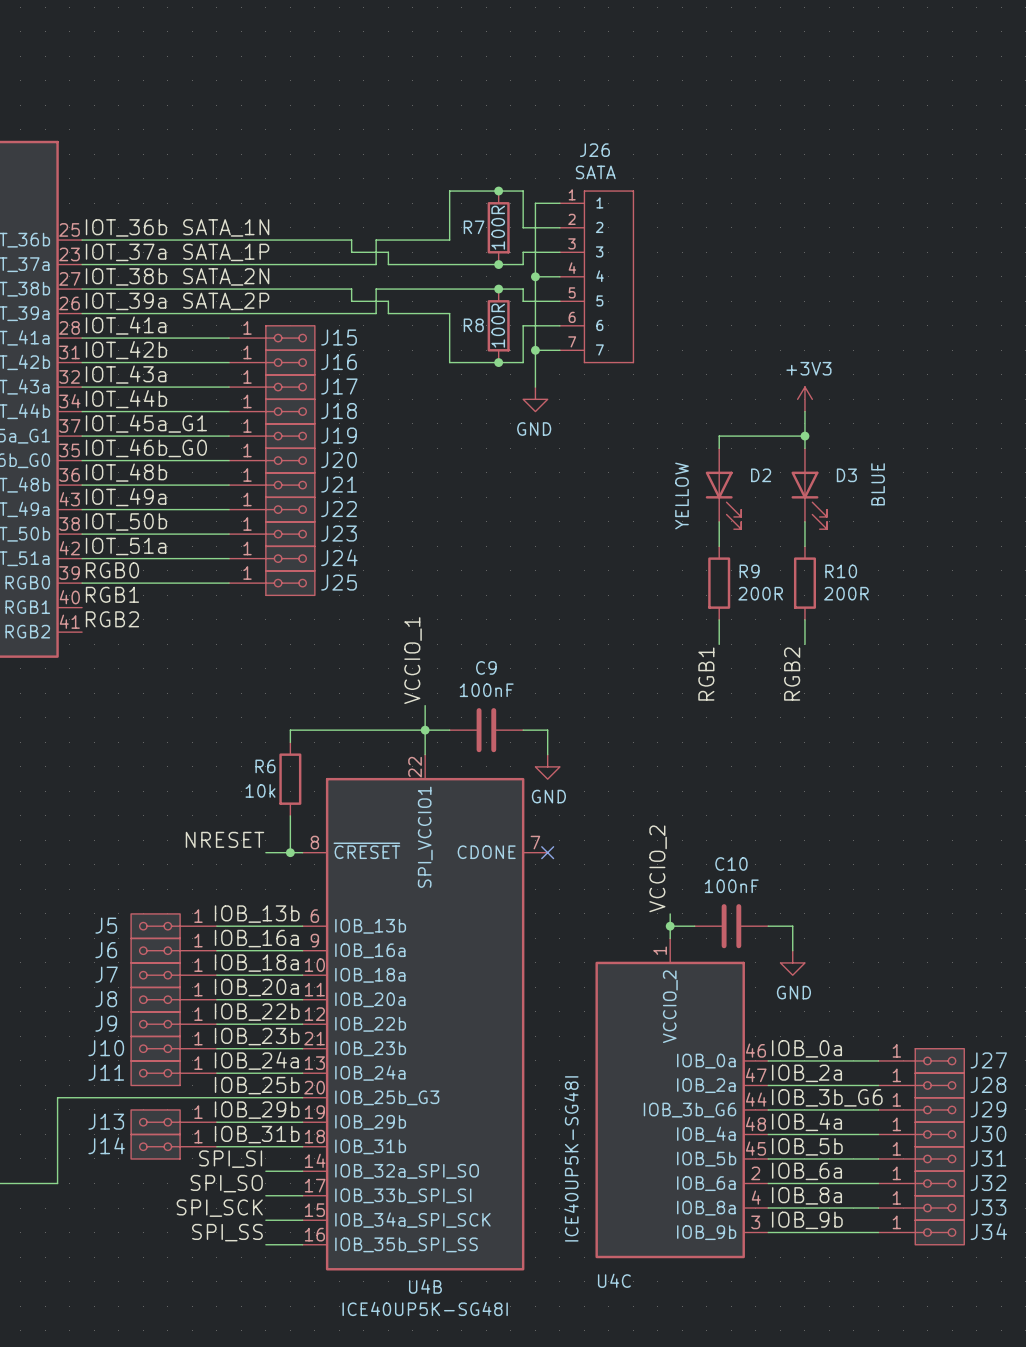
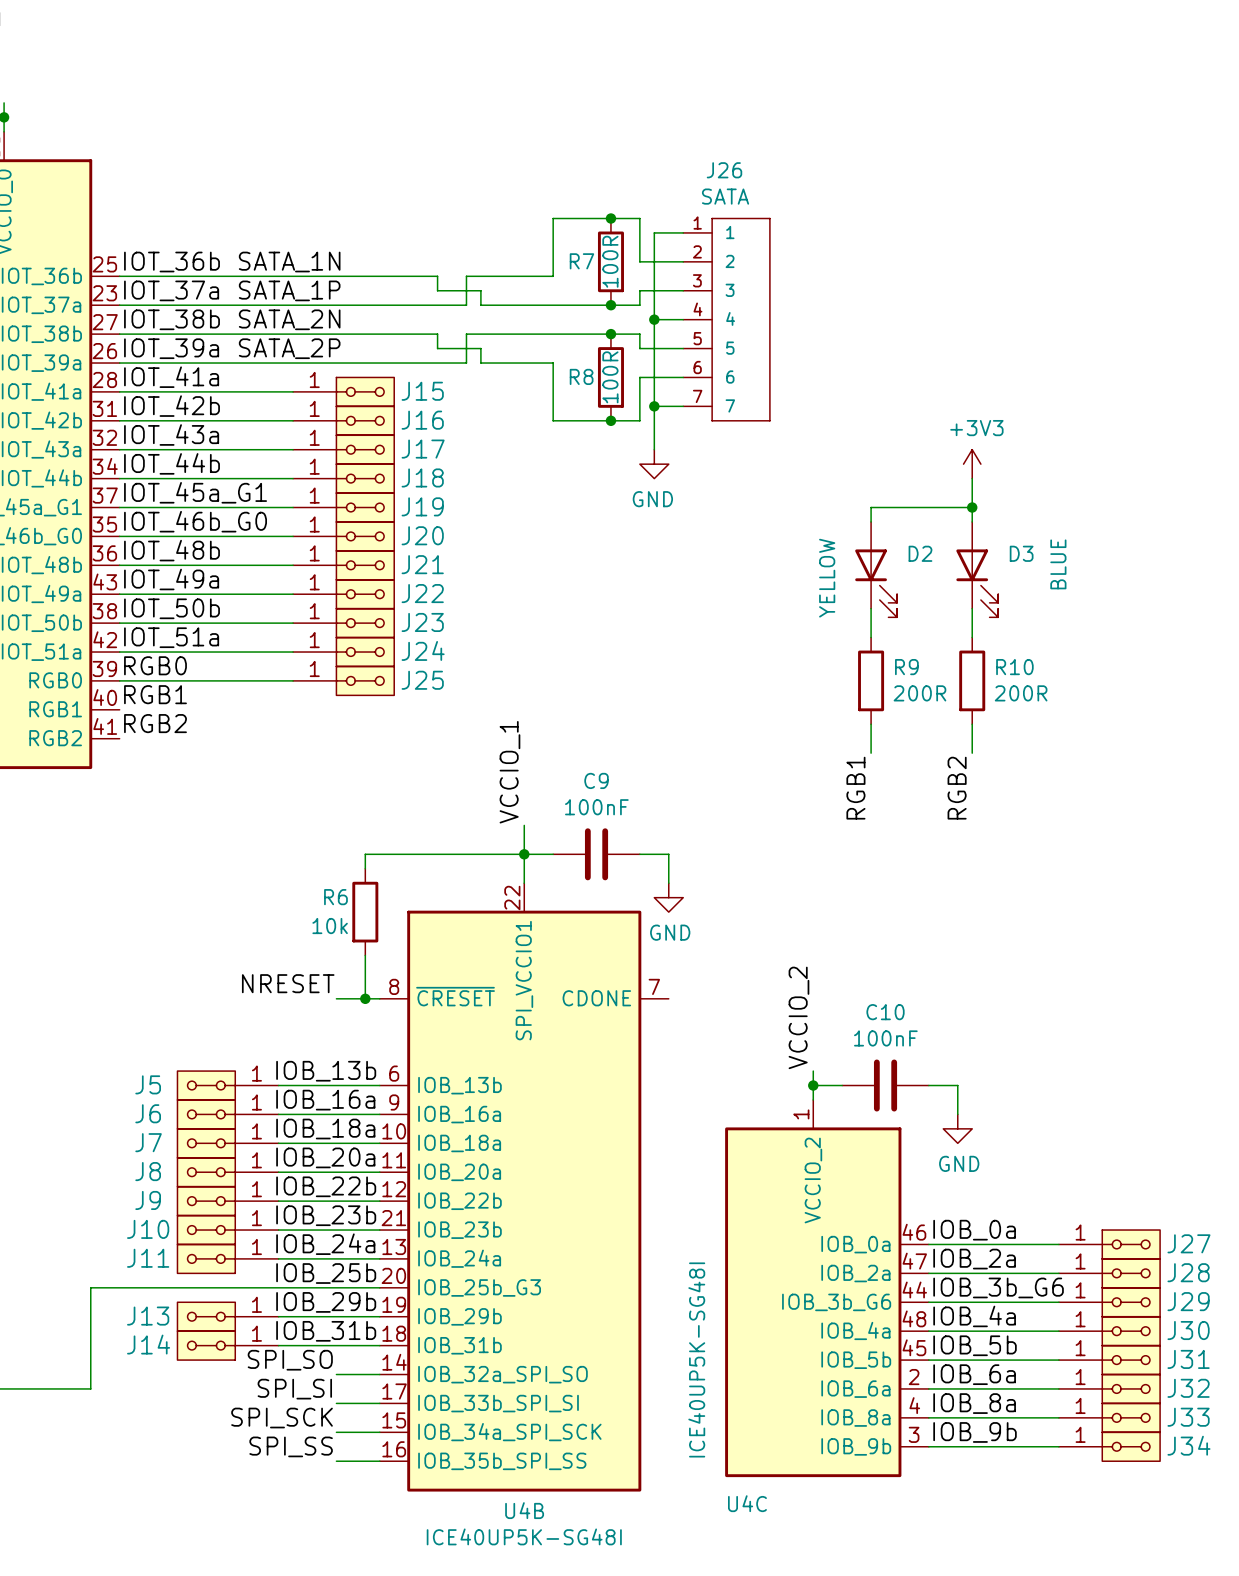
no-connect mark: (547, 852) -> none
label: SPI_SI (230, 1159) -> SPI_SO (290, 1360)
label: SPI_SO (226, 1183) -> SPI_SI (294, 1389)

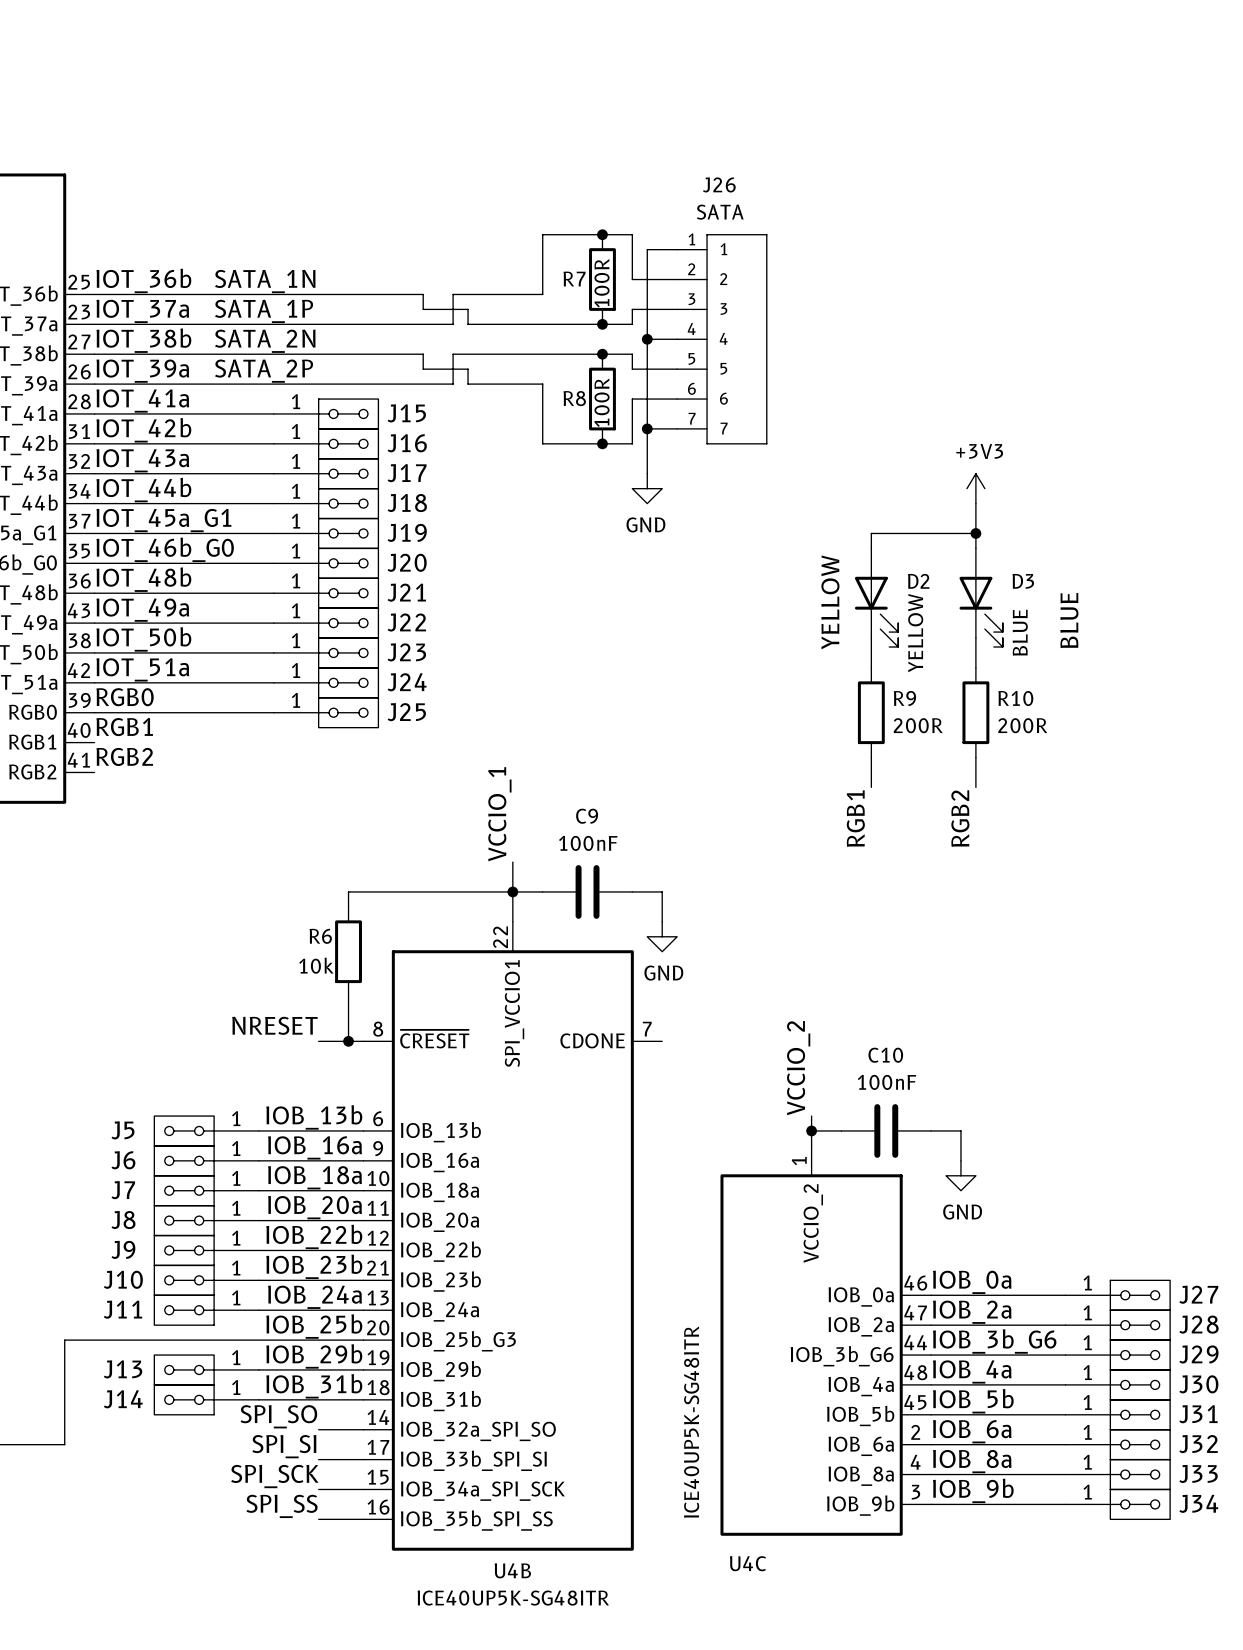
D3 value position: BLUE (1058, 564) -> BLUE (1020, 632)
text: none -> YELLOW (830, 602)
D2 value position: YELLOW (827, 578) -> YELLOW (915, 633)
text: none -> BLUE (1069, 620)
U4C value: ICE40UP5K-SG48I (696, 1359) -> ICE40UP5K-SG48ITR (691, 1422)
U4B value: ICE40UP5K-SG48I (524, 1536) -> ICE40UP5K-SG48ITR (513, 1598)

